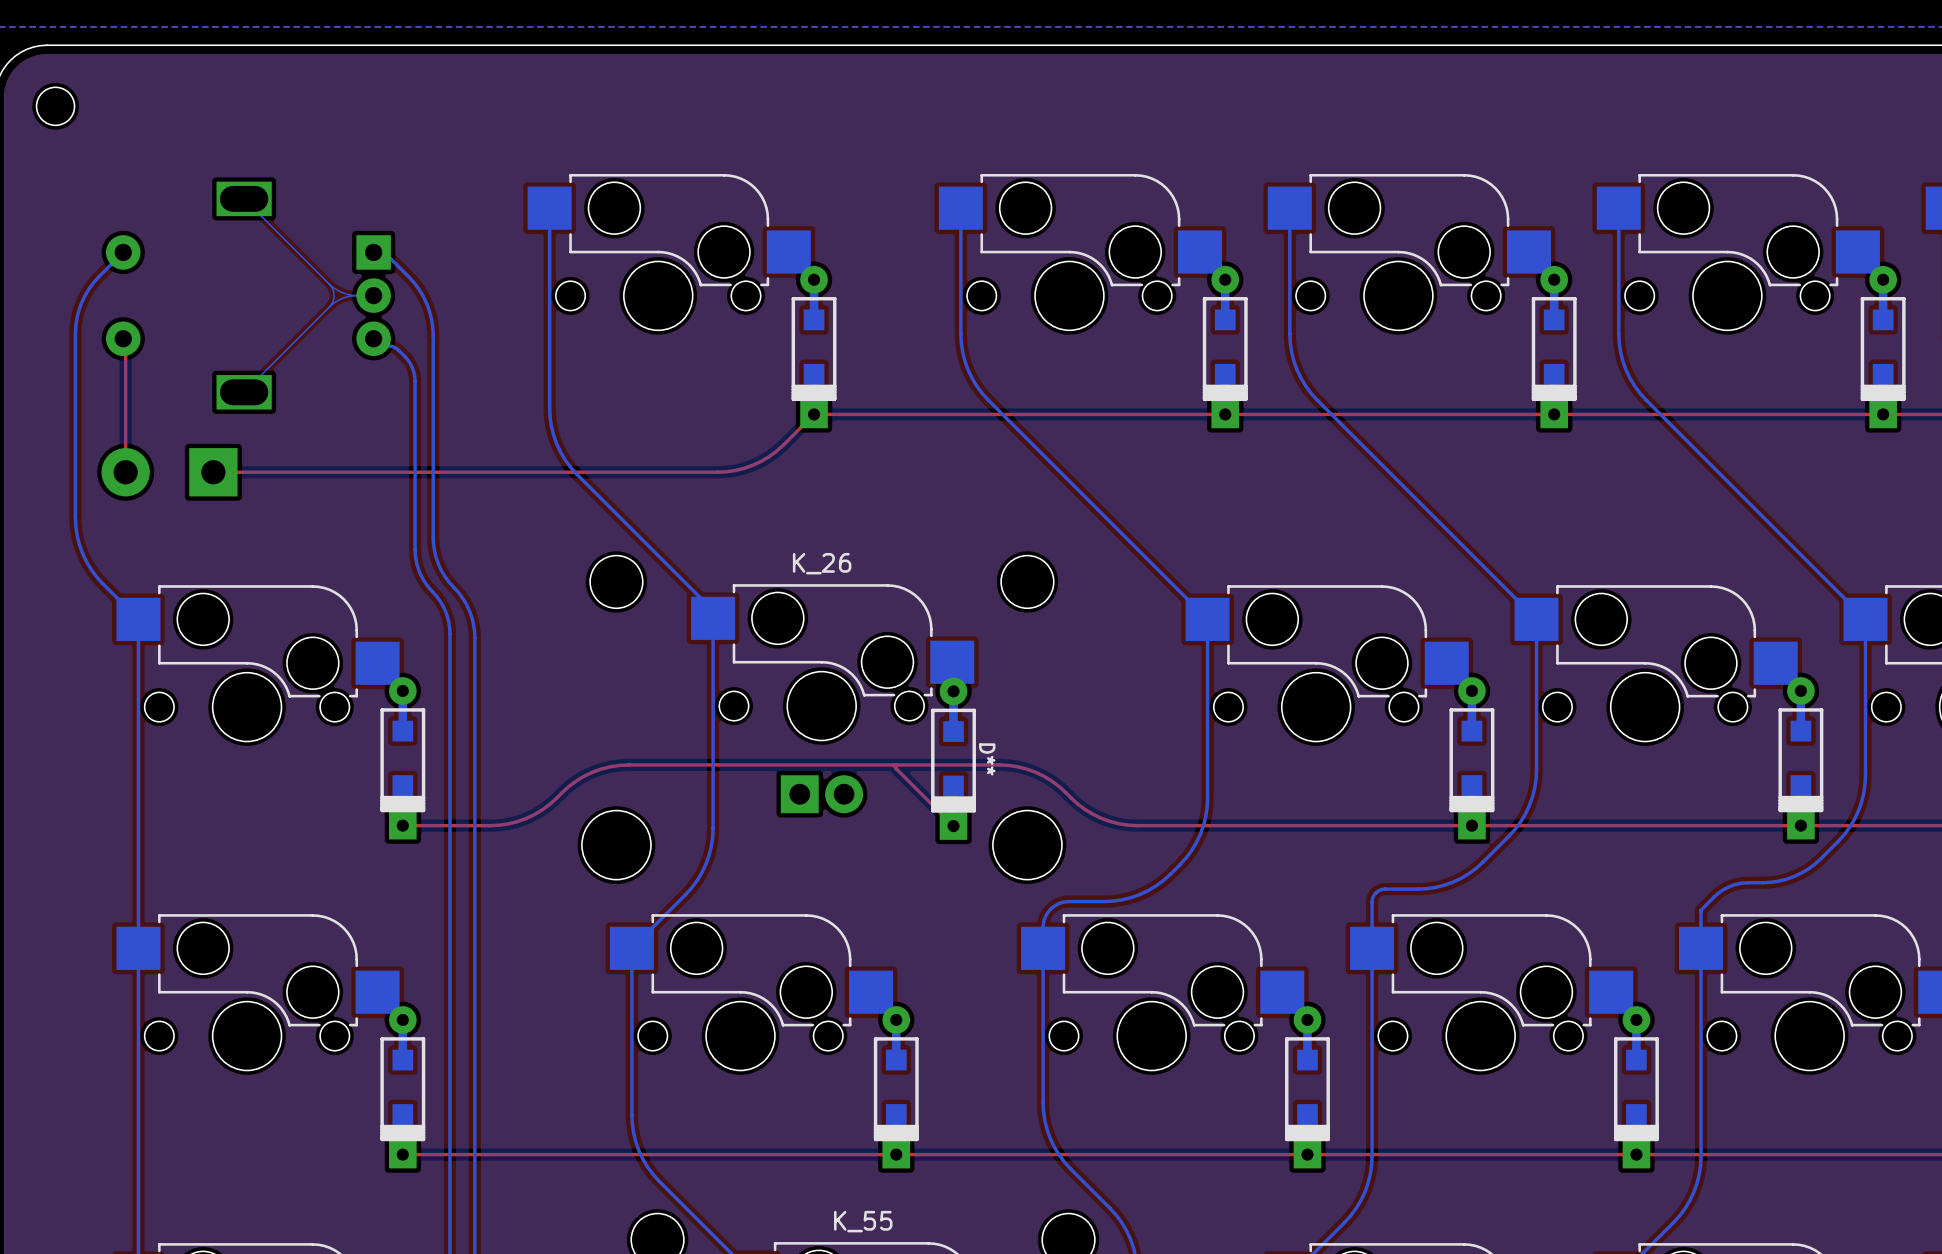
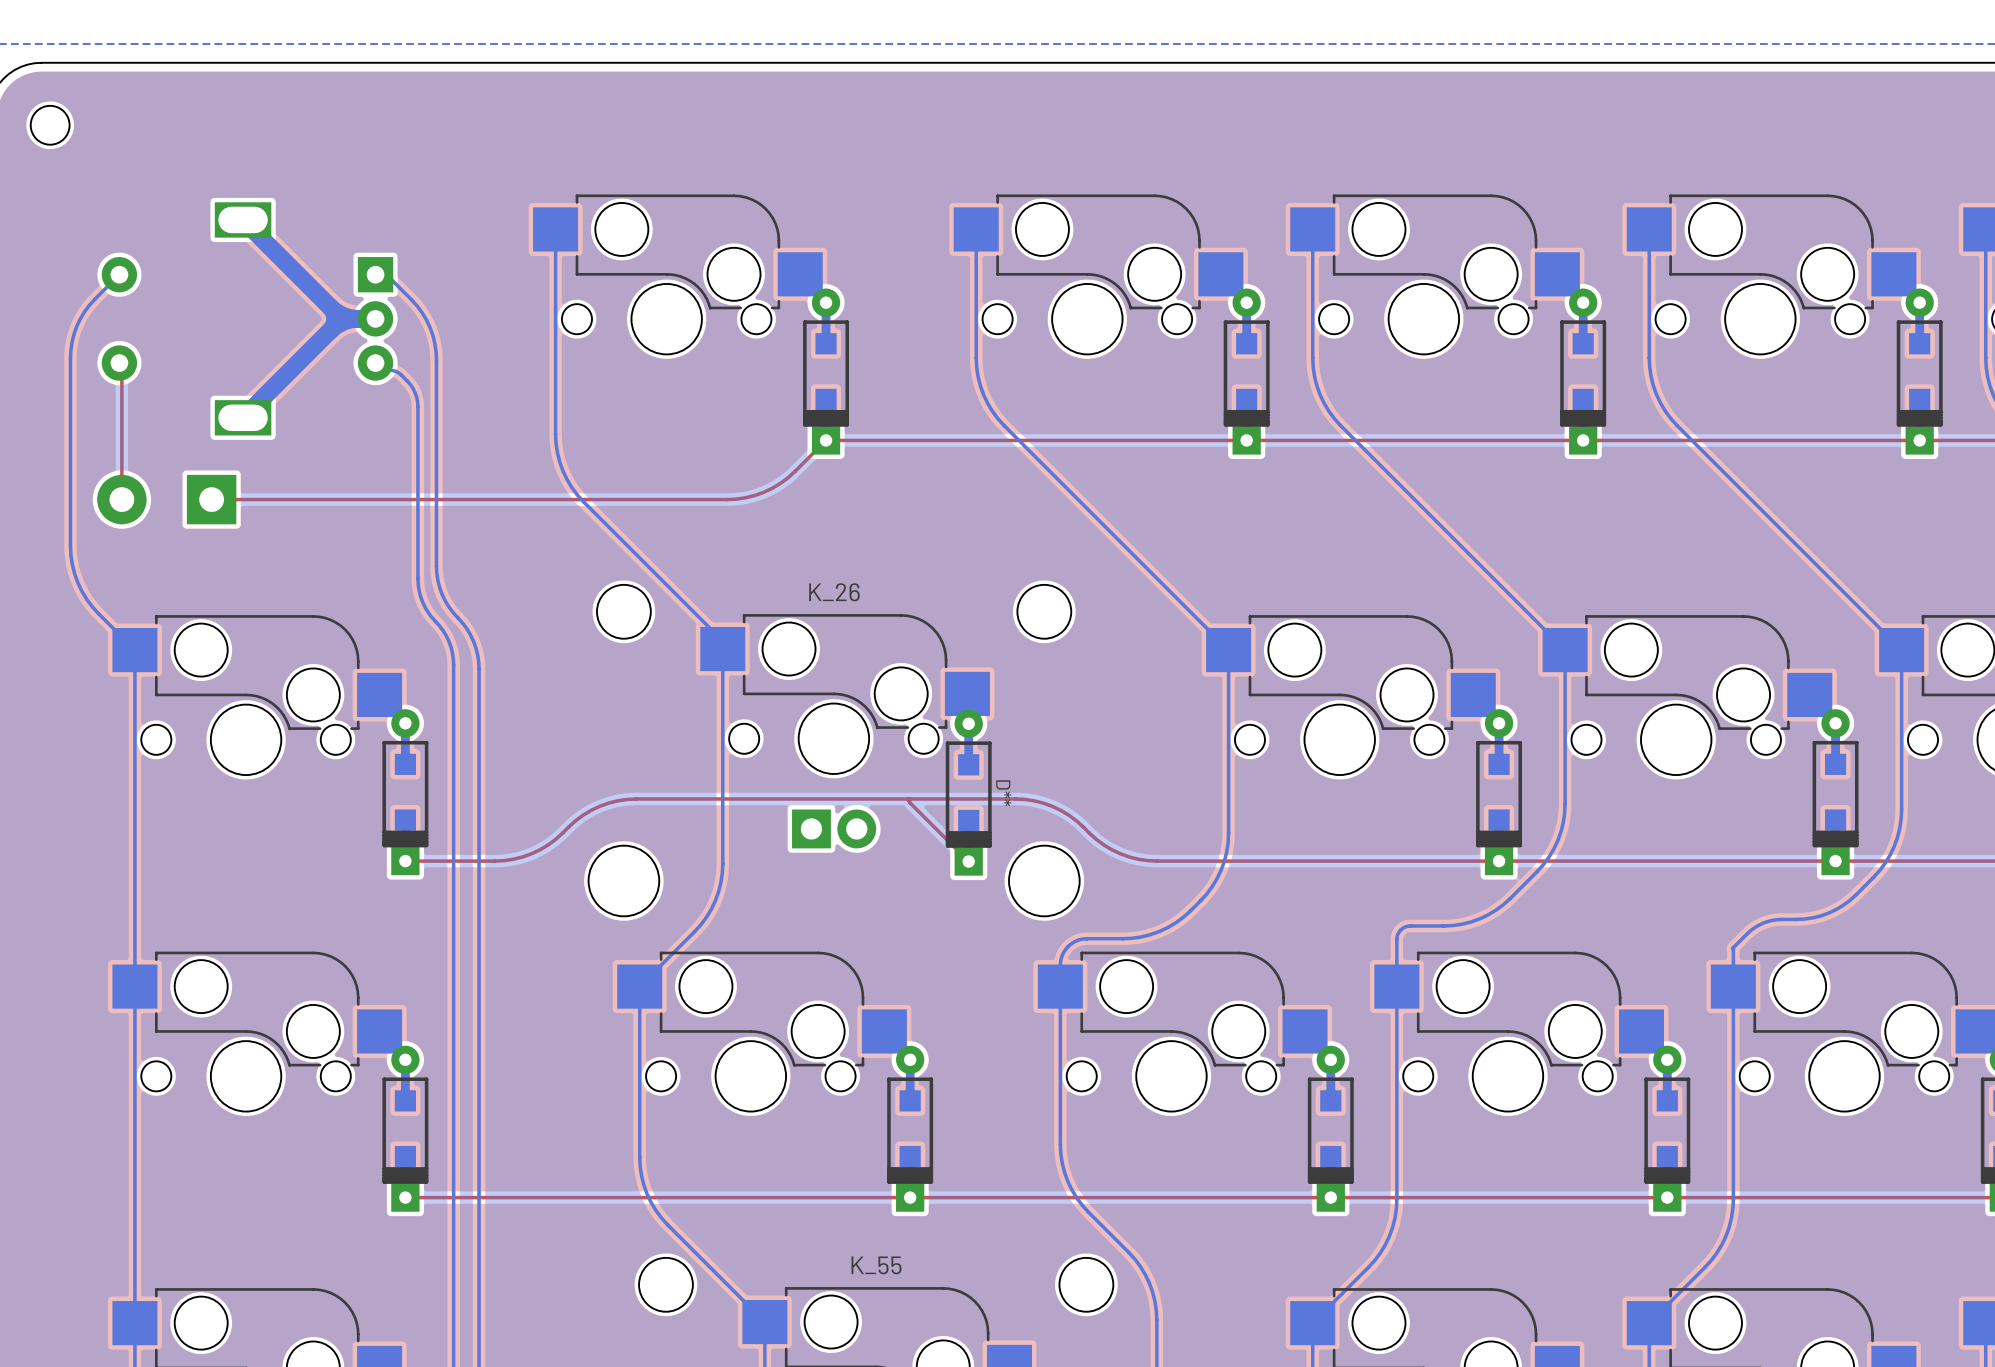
bottom track width: thin (244, 198) (329, 283) -> thick (243, 219) (330, 307)
bottom track width: thin (329, 283) (342, 292) (357, 295) (342, 298) (329, 307) -> thick (330, 307) (343, 315) (358, 318) (343, 321) (330, 330)
bottom track width: thin (329, 283) (334, 295) (329, 307) -> thick (330, 307) (335, 318) (330, 330)
bottom track width: thin (329, 307) (244, 392) -> thick (330, 330) (243, 417)

